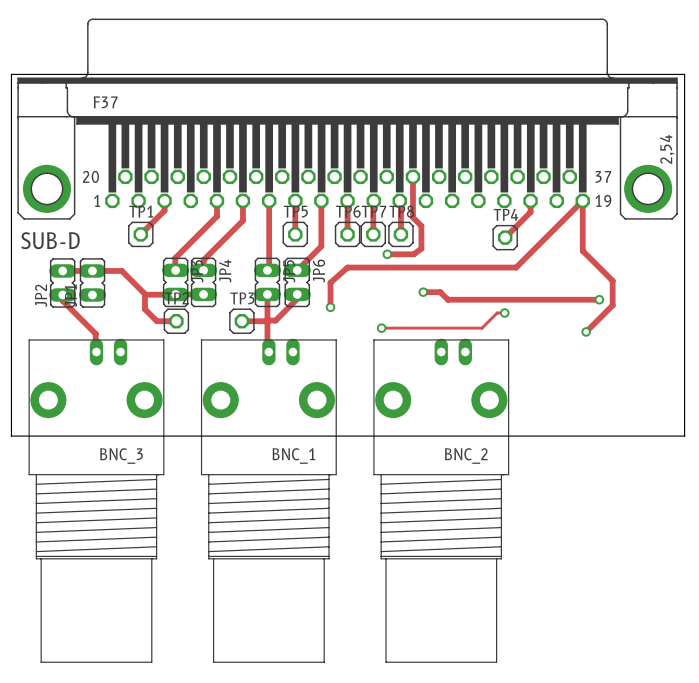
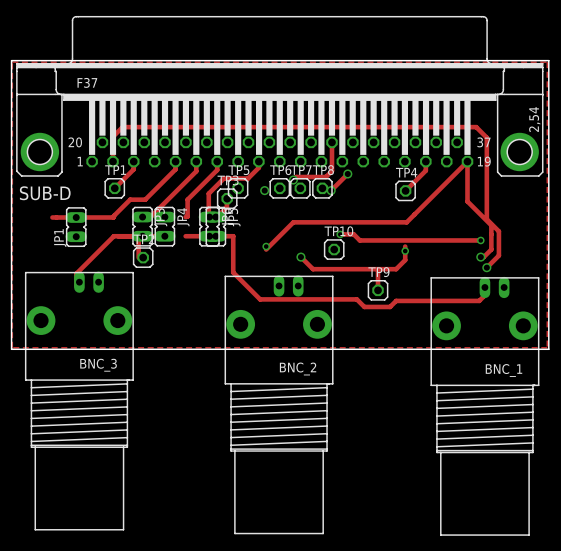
zone outline: none -> (12, 62) (547, 62) (547, 347) (12, 347) (12, 62)
track: none -> (113, 161) (113, 136) (122, 127) (476, 127) (486, 137) (486, 219) (498, 231) (498, 255) (486, 267)
track: (216, 200) (216, 216) (175, 258) (175, 270) -> (175, 161) (175, 169) (145, 199) (130, 199) (113, 217) (99, 217)
track: (295, 200) (295, 234) -> none
track: (347, 200) (347, 234) -> none
track: (373, 200) (373, 234) -> none
track: (399, 200) (400, 234) -> none
track: (321, 208) (321, 246) (297, 270) -> (258, 167) (248, 178) (223, 178) (208, 193) (208, 216) (217, 217) (226, 207) (227, 198)
track: (269, 211) (269, 270) (267, 270) -> (217, 170) (187, 199) (187, 216) (185, 217)
track: (412, 212) (412, 217) (421, 225) (421, 248) (413, 254) (387, 254) -> (332, 170) (325, 177) (296, 177) (293, 180)
track: (242, 213) (242, 220) (203, 259) (203, 270) -> (196, 171) (151, 216) (139, 217)
track: none -> (347, 173) (331, 190)
via: none -> (347, 173)
via: none -> (293, 180)
via: none -> (264, 190)
via: none -> (331, 190)
via: (387, 254) -> none
track: (516, 267) (347, 267) (330, 282) (330, 307) -> (414, 214) (406, 222) (293, 222) (266, 249)
track: (121, 270) (145, 294) (144, 309) (156, 321) (176, 321) -> none
JP2: (62, 282) -> none
JP6 position: (297, 282) -> (209, 226)
track: none -> (185, 236) (233, 236) (233, 272) (260, 299) (356, 299) (364, 306) (390, 306) (396, 300) (479, 300) (483, 296) (484, 287)
track: (269, 294) (267, 294) (267, 350) -> none
track: (297, 294) (297, 298) (275, 320) (267, 322) -> none
track: (62, 295) (62, 300) (95, 333) (96, 352) -> none
track: (612, 305) (586, 331) -> (491, 245) (491, 249) (483, 257) (480, 257)
track: none -> (405, 246) (405, 260) (396, 269) (313, 269) (300, 257)
TP10: none -> (334, 249)
track: (504, 312) (497, 312) (482, 328) (381, 328) -> none
track: (267, 320) (241, 321) -> none
via: none -> (300, 257)
via: none -> (480, 257)
track: none -> (138, 257) (139, 236) (113, 236) (76, 273) (76, 285)
TP3 position: (241, 321) -> (227, 198)
via: (381, 328) -> none
via: (586, 331) -> none
via: none -> (486, 267)
track: none -> (378, 269) (378, 290)
TP9: none -> (378, 290)
BNC_1 position: (268, 500) -> (484, 406)
BNC_2 position: (441, 500) -> (279, 404)

